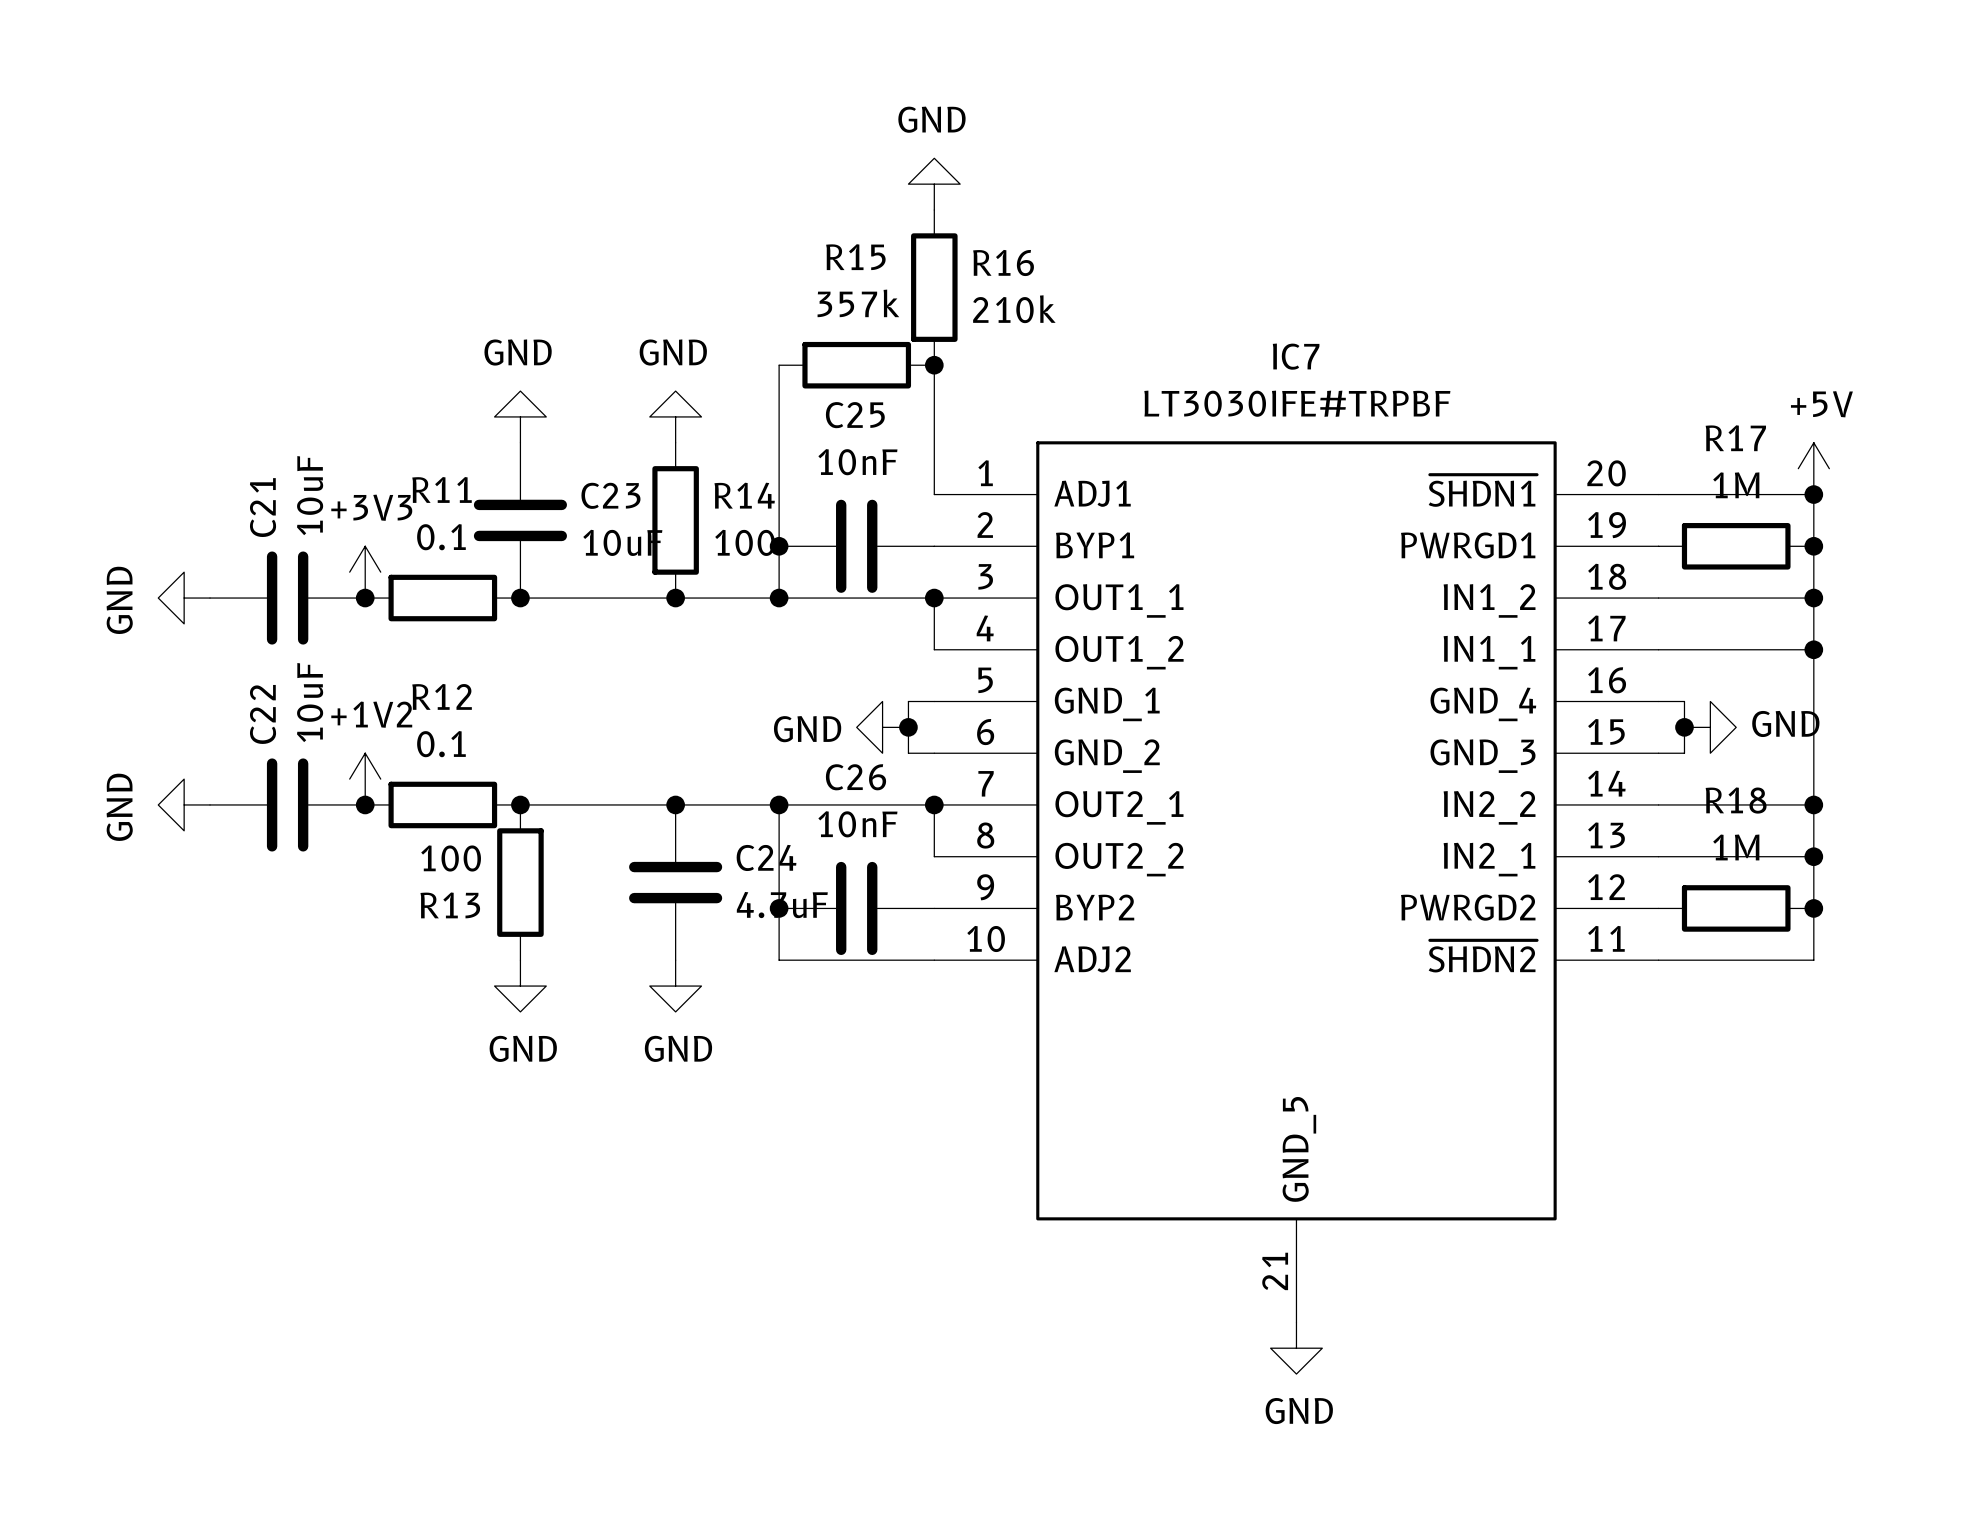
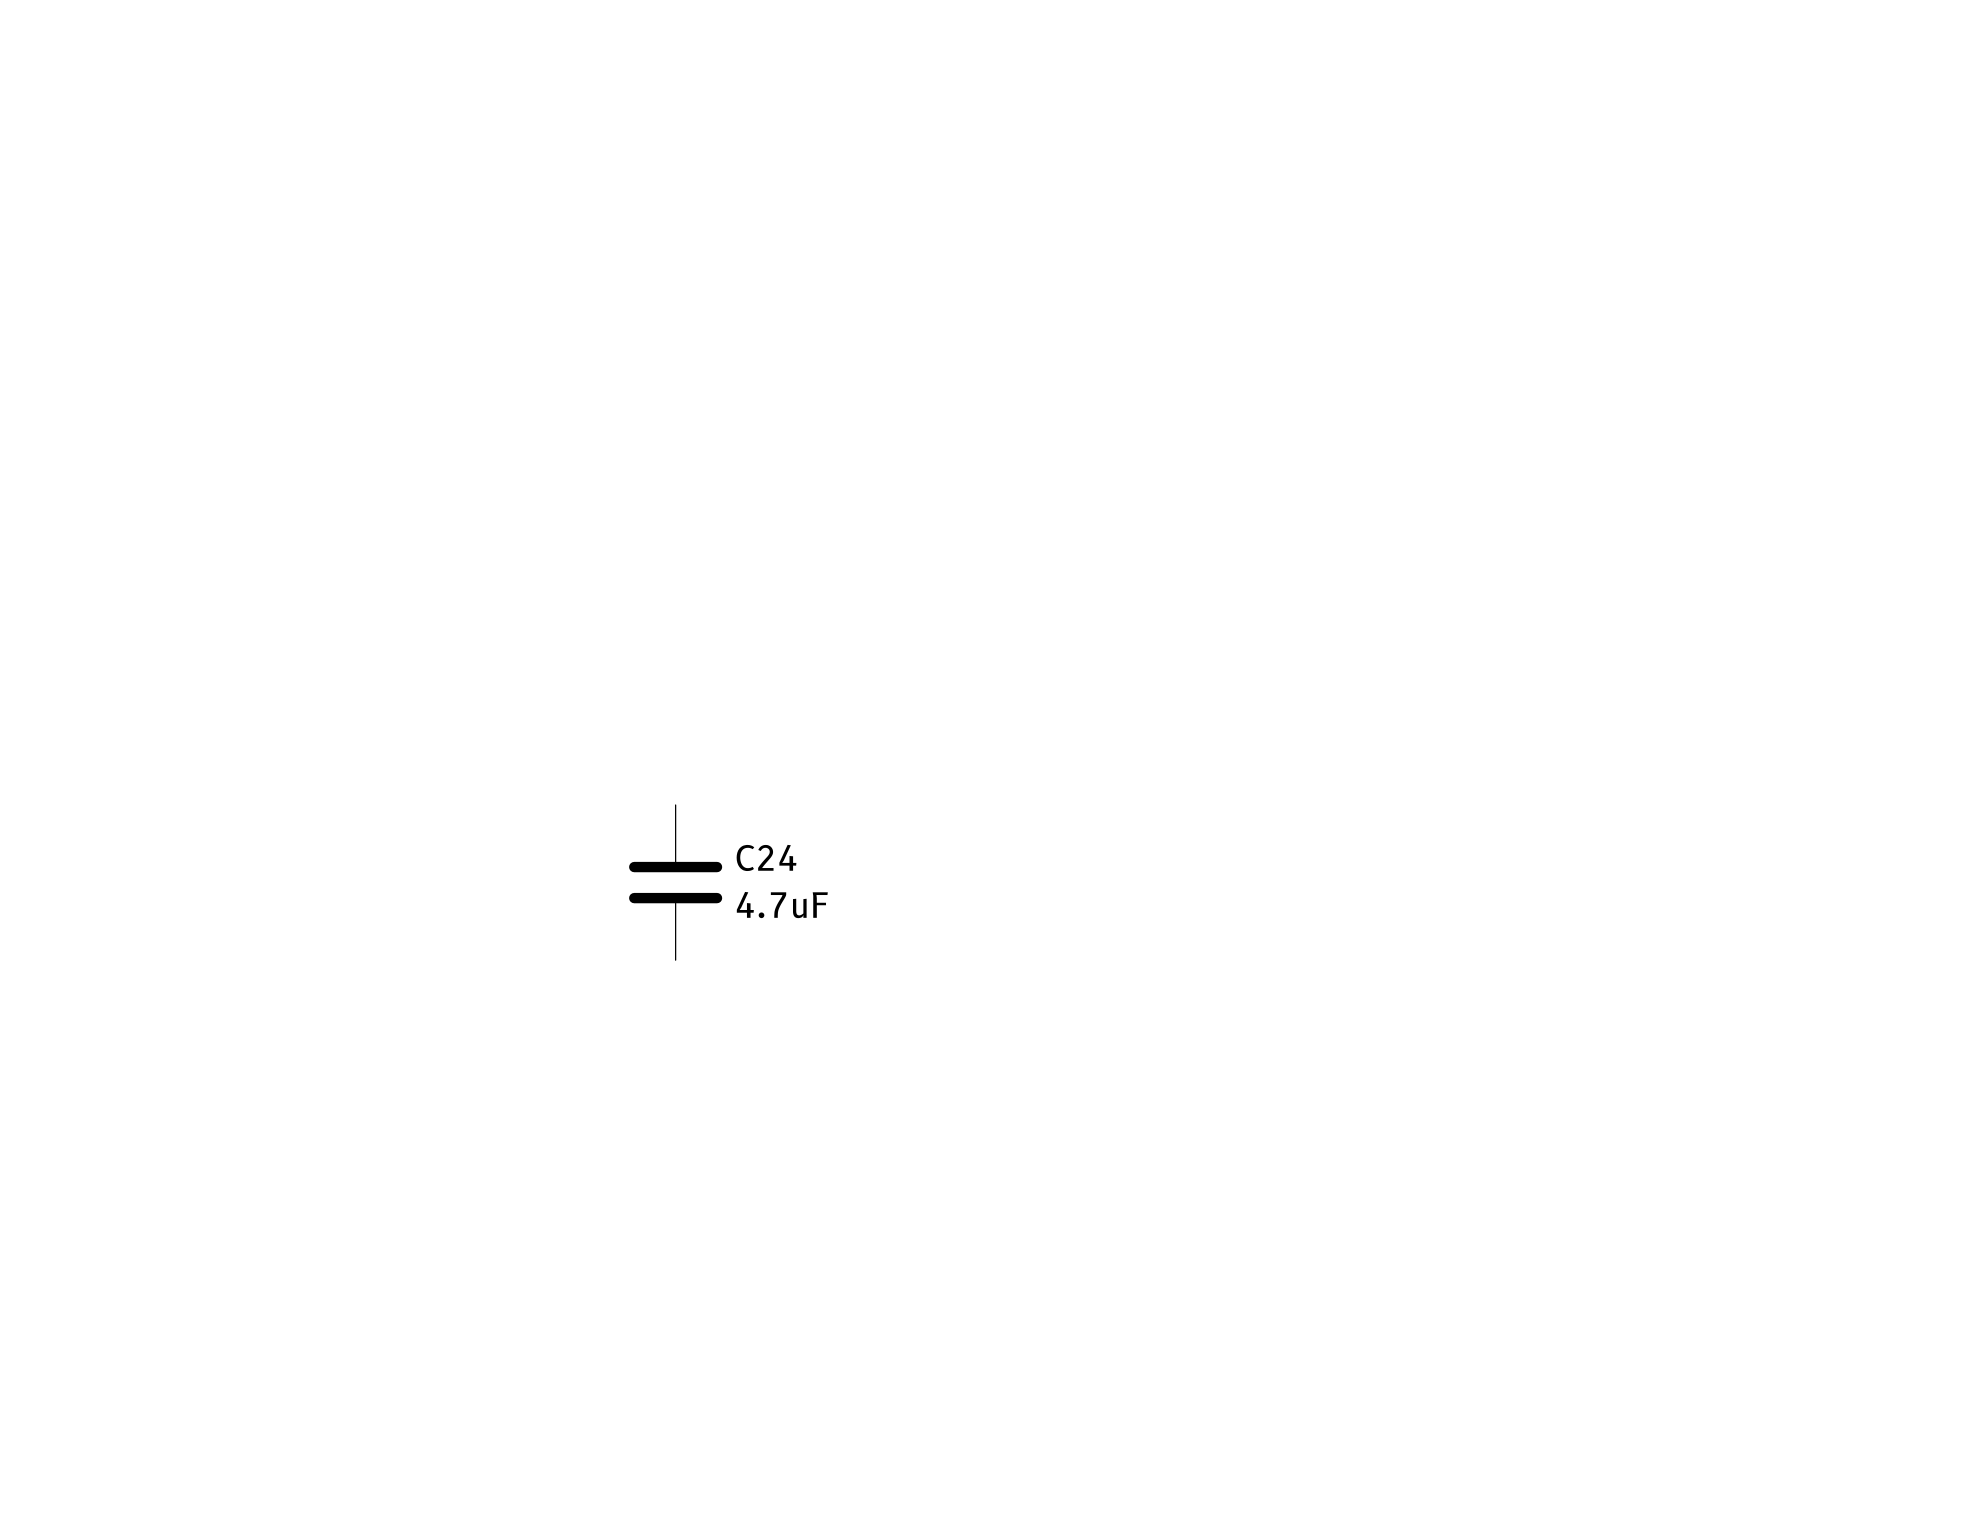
power symbol: GND (934, 184) -> none
R16: 210k (934, 287) -> none
wire: (779, 365) (779, 598) -> none
R15: 357k (856, 365) -> none
wire: (934, 365) (934, 494) -> none
junction: (934, 365) -> none
power symbol: GND (520, 416) -> none
power symbol: GND (675, 416) -> none
power symbol: +5V (1813, 468) -> none
wire: (1658, 494) (1813, 494) (1813, 960) (1658, 960) -> none
junction: (1813, 494) -> none
C23: 10uF (520, 520) -> none
R14: 100 (675, 520) -> none
junction: (779, 546) -> none
C25: 10nF (856, 546) -> none
R17: 1M (1736, 546) -> none
junction: (1813, 546) -> none
power symbol: +3V3 (365, 572) -> none
power symbol: GND (184, 598) -> none
C21: 10uF (287, 598) -> none
junction: (365, 598) -> none
R11: 0.1 (442, 598) -> none
wire: (520, 598) (934, 598) (934, 649) -> none
junction: (520, 598) -> none
junction: (675, 598) -> none
junction: (779, 598) -> none
junction: (934, 598) -> none
wire: (1658, 598) (1813, 598) -> none
junction: (1813, 598) -> none
wire: (1658, 649) (1813, 649) -> none
junction: (1813, 649) -> none
wire: (934, 701) (908, 701) (908, 753) (934, 753) -> none
wire: (1658, 701) (1684, 701) (1684, 753) (1658, 753) -> none
power symbol: GND (882, 727) -> none
junction: (908, 727) -> none
junction: (1684, 727) -> none
power symbol: GND (1710, 727) -> none
power symbol: +1V2 (365, 779) -> none
power symbol: GND (184, 804) -> none
C22: 10uF (287, 804) -> none
junction: (365, 804) -> none
R12: 0.1 (442, 804) -> none
wire: (520, 804) (934, 804) (934, 856) -> none
junction: (520, 804) -> none
junction: (675, 804) -> none
wire: (779, 804) (779, 960) (934, 960) -> none
junction: (779, 804) -> none
junction: (934, 804) -> none
wire: (1658, 804) (1813, 804) -> none
junction: (1813, 804) -> none
wire: (1658, 856) (1813, 856) -> none
junction: (1813, 856) -> none
IC7: LT3030IFE#TRPBF (1296, 881) -> none
R13: 100 (520, 882) -> none
junction: (779, 908) -> none
C26: 10nF (856, 908) -> none
R18: 1M (1736, 908) -> none
junction: (1813, 908) -> none
power symbol: GND (520, 986) -> none
power symbol: GND (675, 986) -> none
power symbol: GND (1296, 1348) -> none

